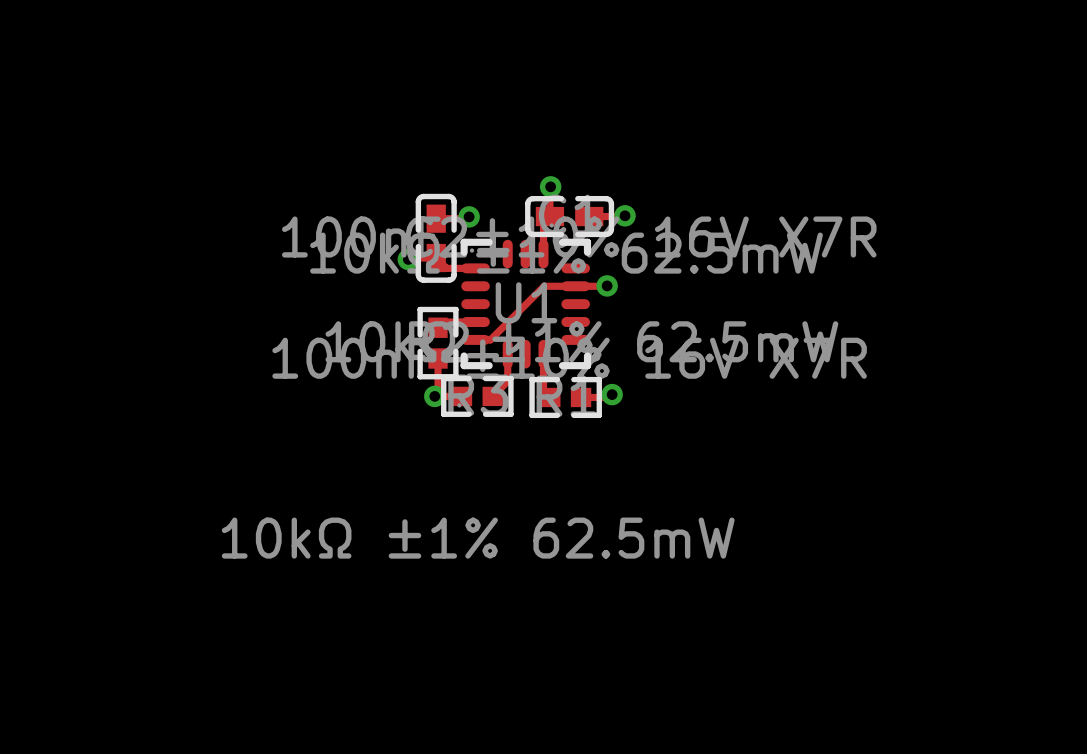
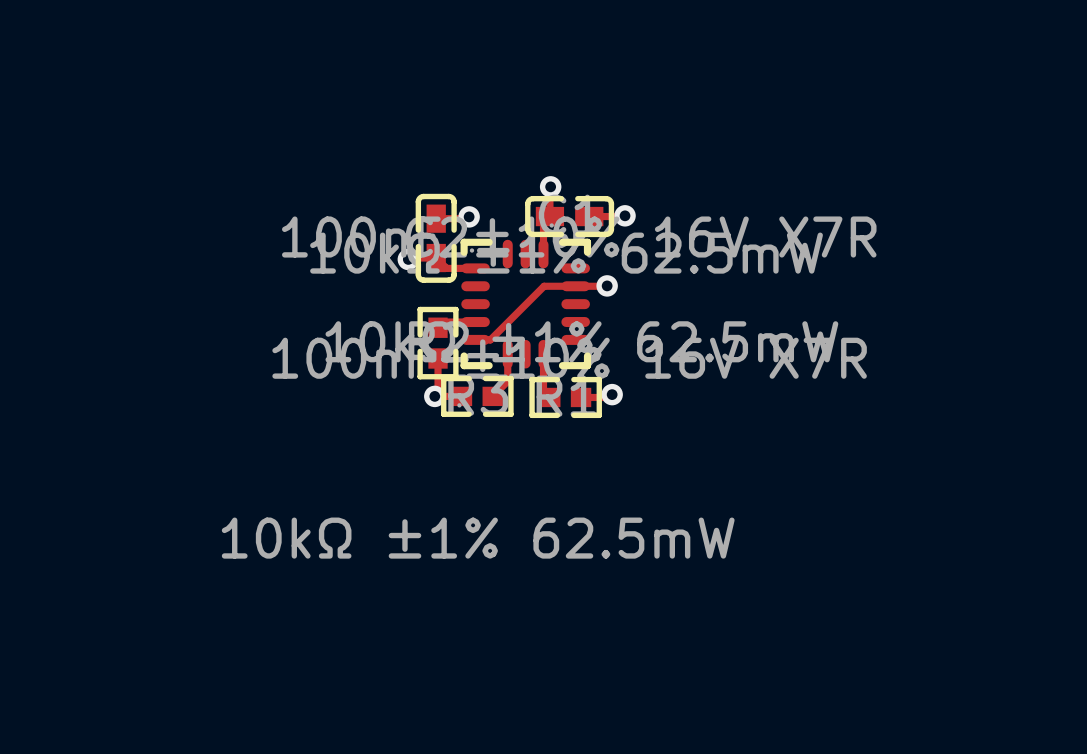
U1 name: U1 (526, 302) -> none

